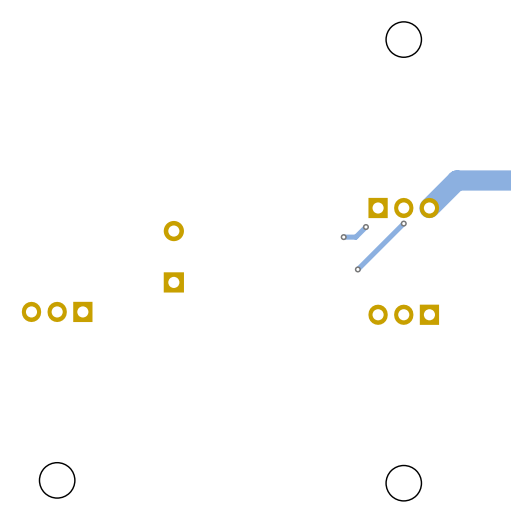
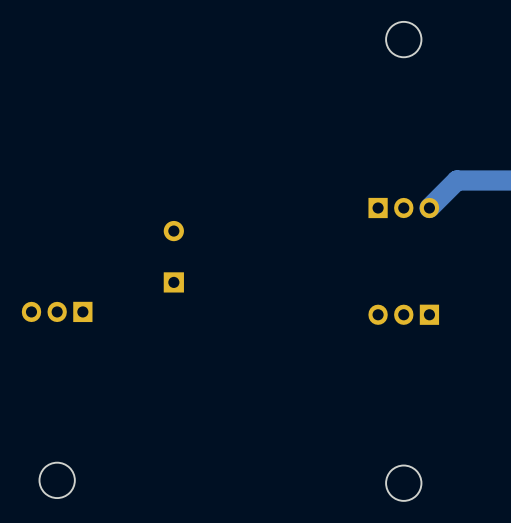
track: (403, 223) (357, 269) -> none
via: (403, 223) -> none
track: (365, 227) (355, 237) (343, 237) -> none
via: (365, 227) -> none
via: (343, 237) -> none
via: (357, 269) -> none

